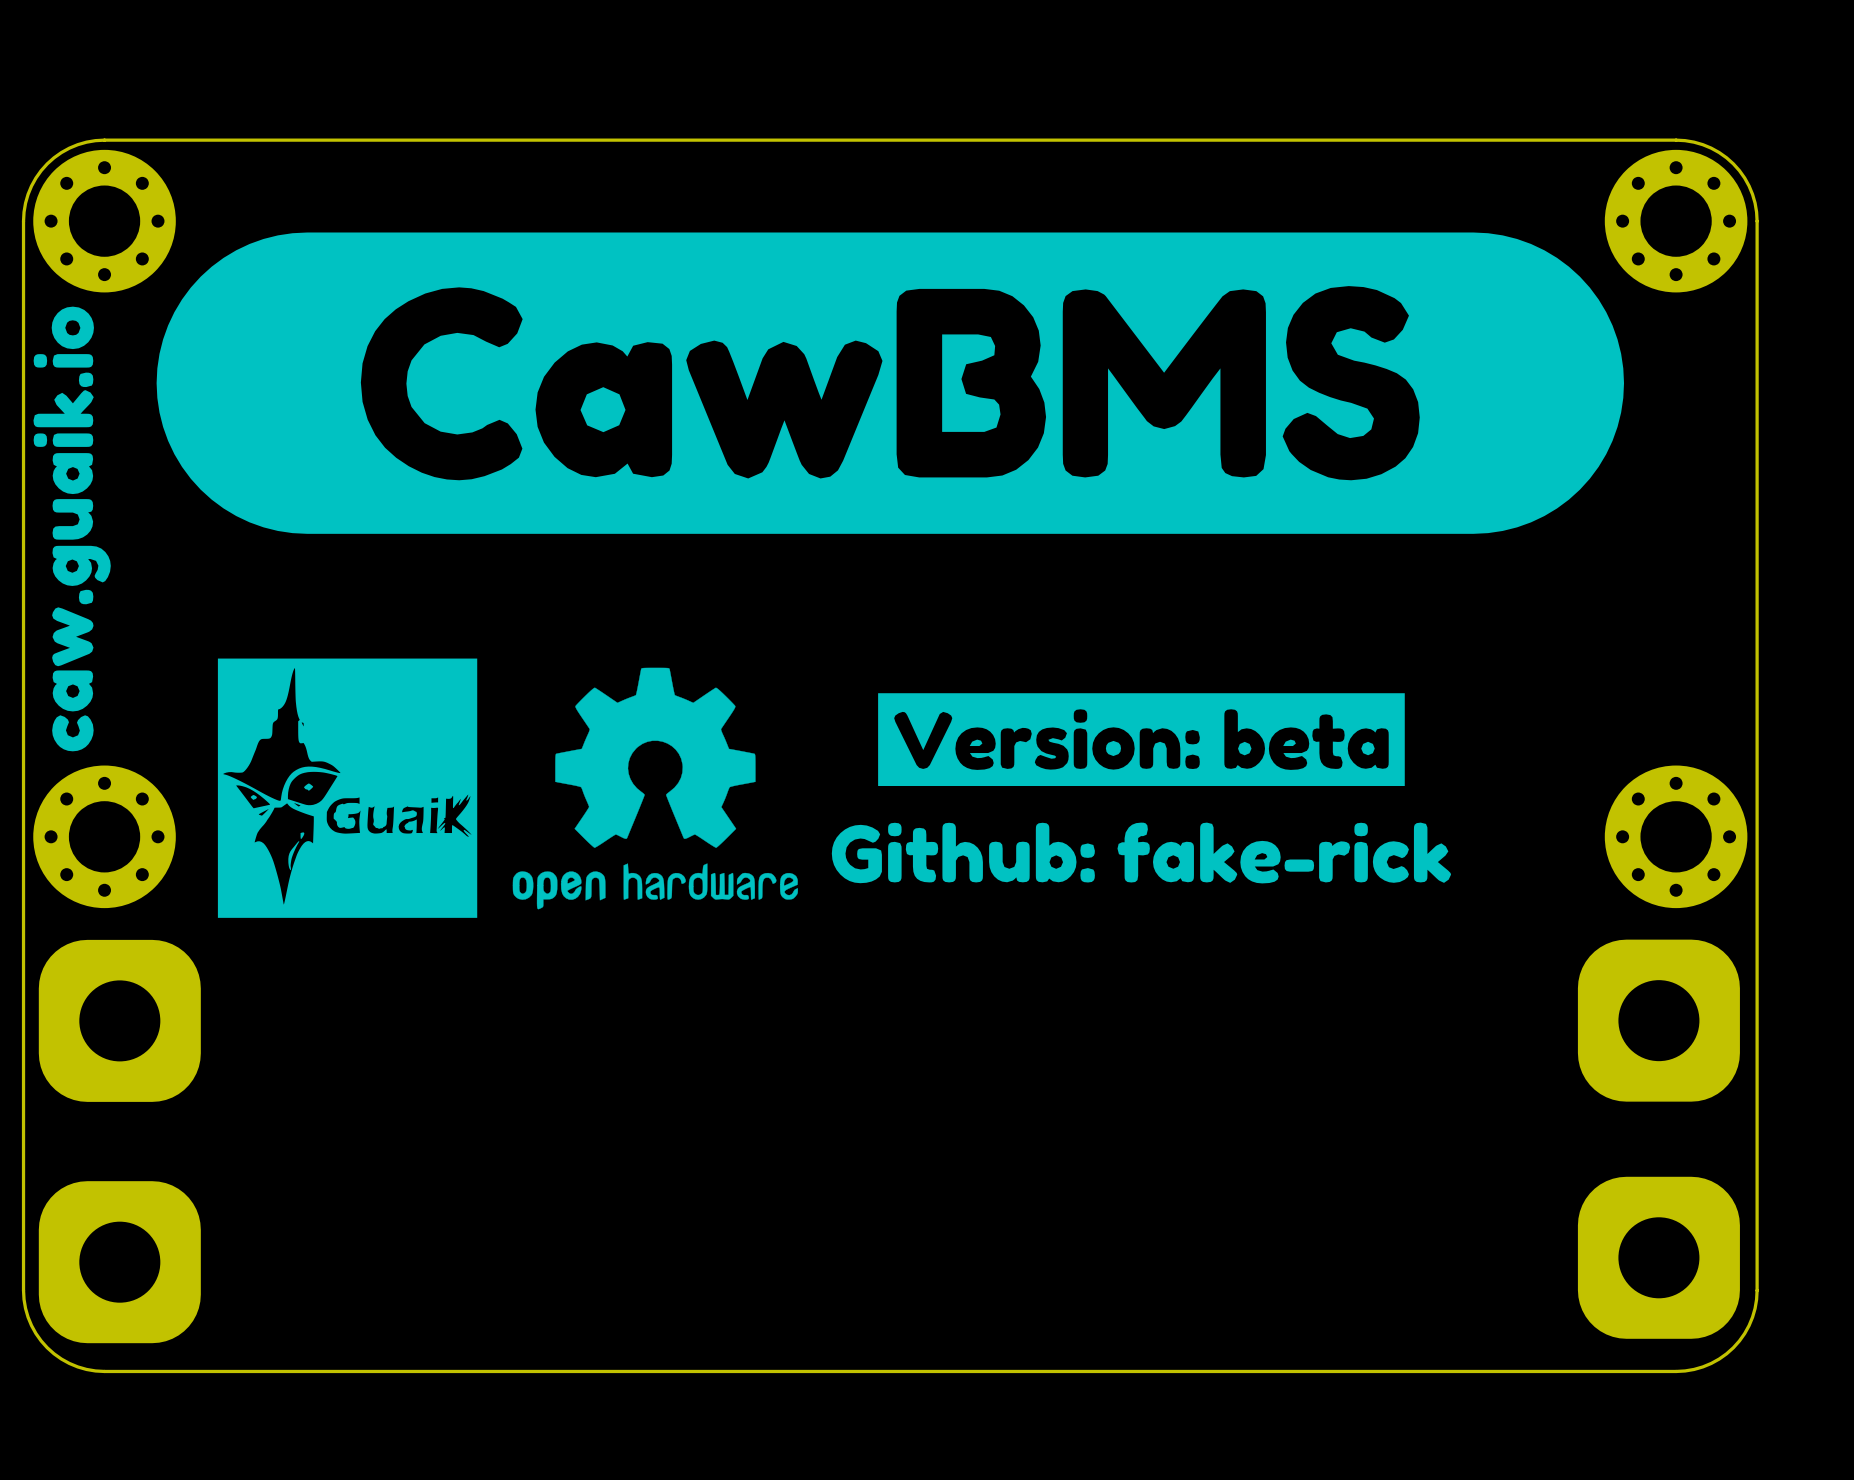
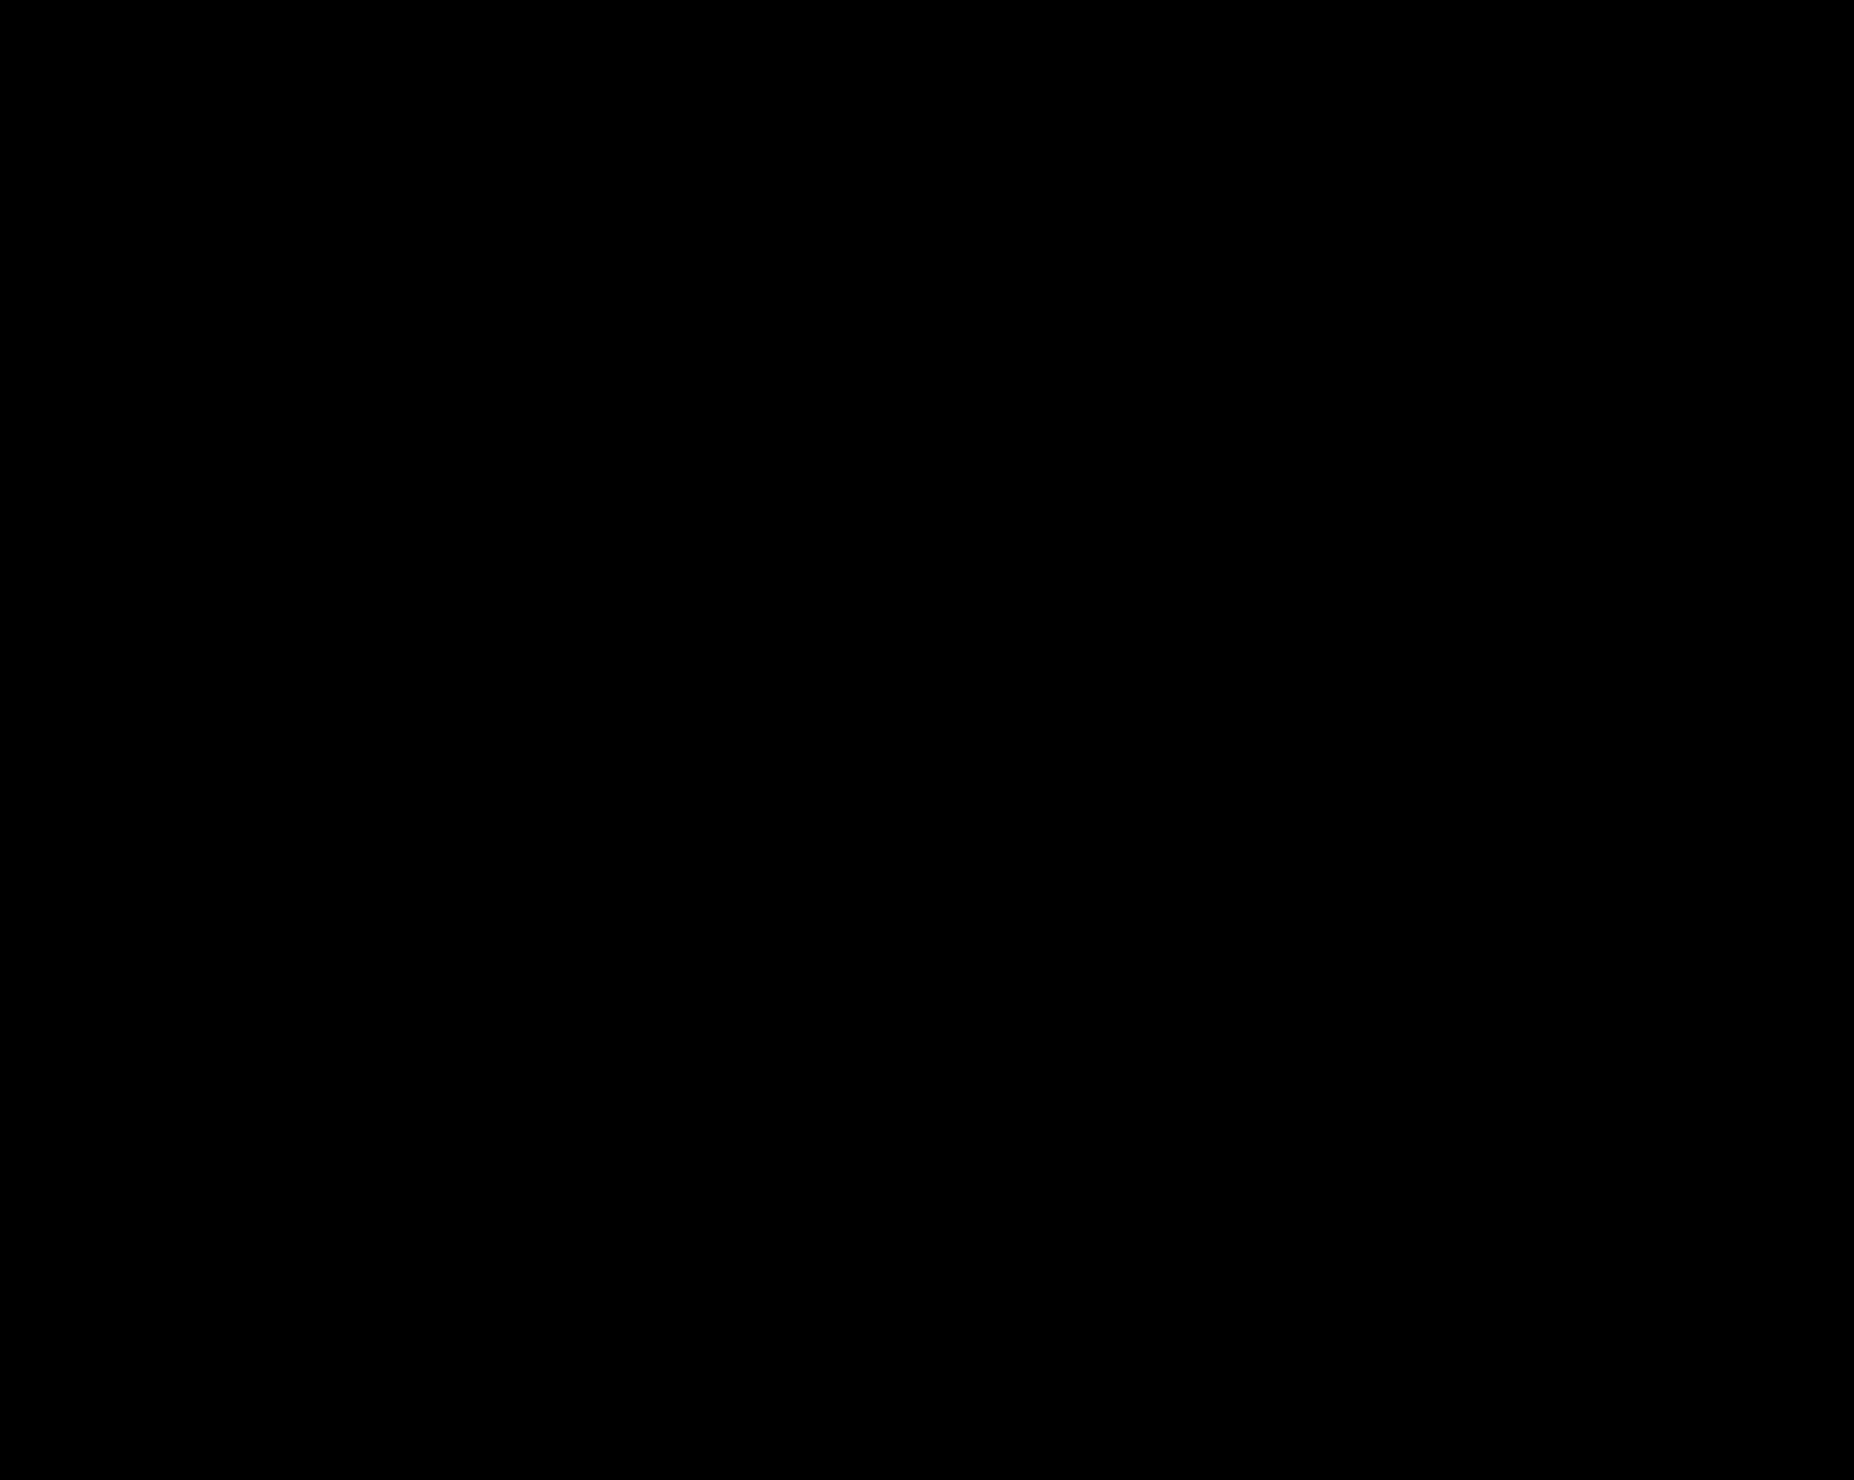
board edge: (1676, 140) (104, 140) (77, 144) (54, 157) (41, 170) (31, 186) (25, 203) (23, 221) (23, 1290) (28, 1317) (41, 1340) (54, 1353) (69, 1363) (86, 1369) (104, 1371) (1676, 1371) (1702, 1366) (1726, 1353) (1739, 1340) (1749, 1325) (1755, 1308) (1757, 1290) (1757, 221) (1755, 203) (1749, 186) (1733, 163) (1711, 148) (1694, 142) (1676, 140) -> none
part: (104, 221) -> none
part: (1676, 221) -> none
drawing: [156, 232, 1625, 534] -> none
drawing: [33, 306, 111, 752] -> none
drawing: [217, 658, 1452, 918] -> none
part: (104, 836) -> none
part: (1676, 836) -> none
part: (119, 1020) -> none
part: (1658, 1020) -> none
part: (1658, 1257) -> none
part: (119, 1262) -> none

